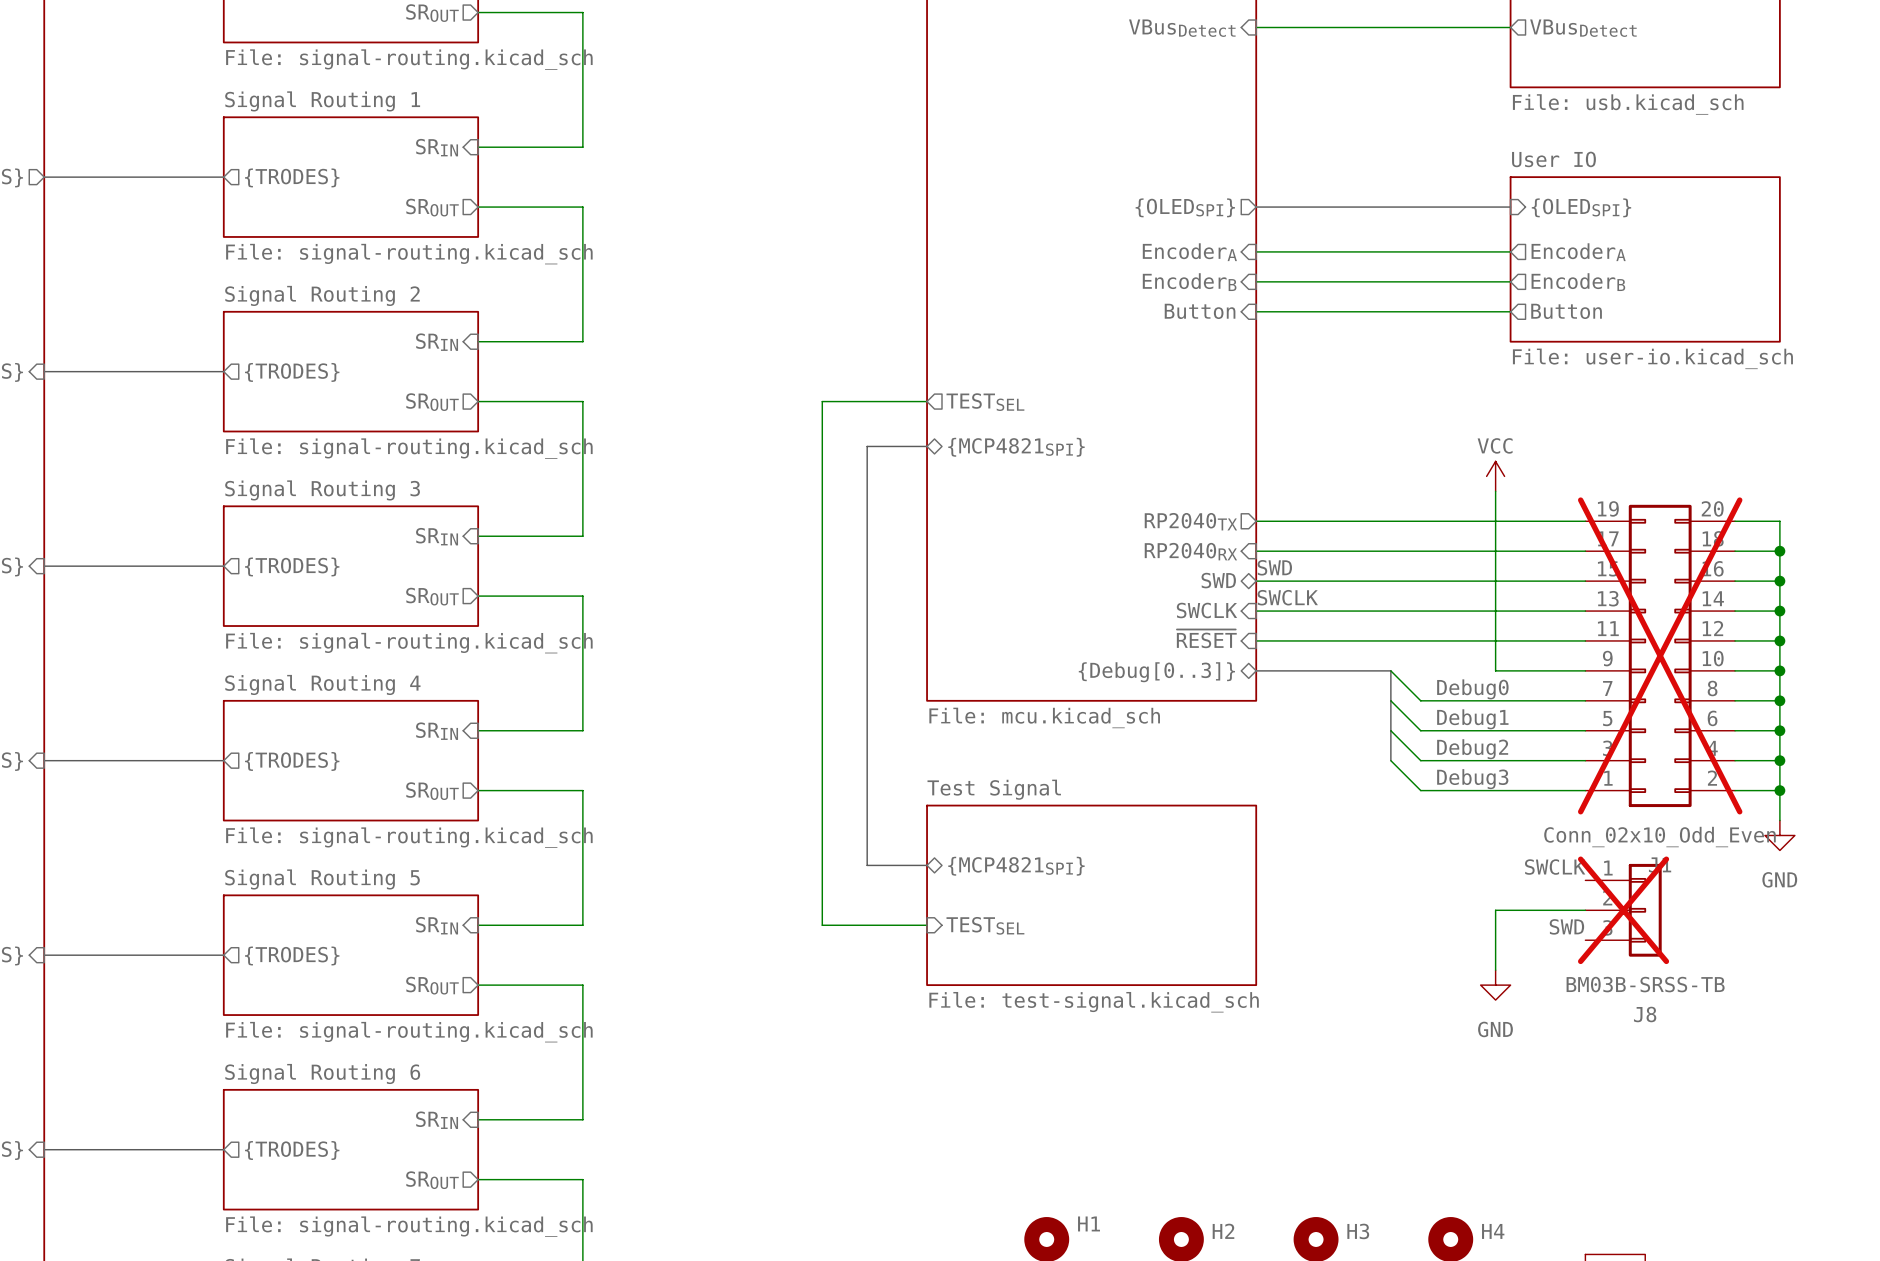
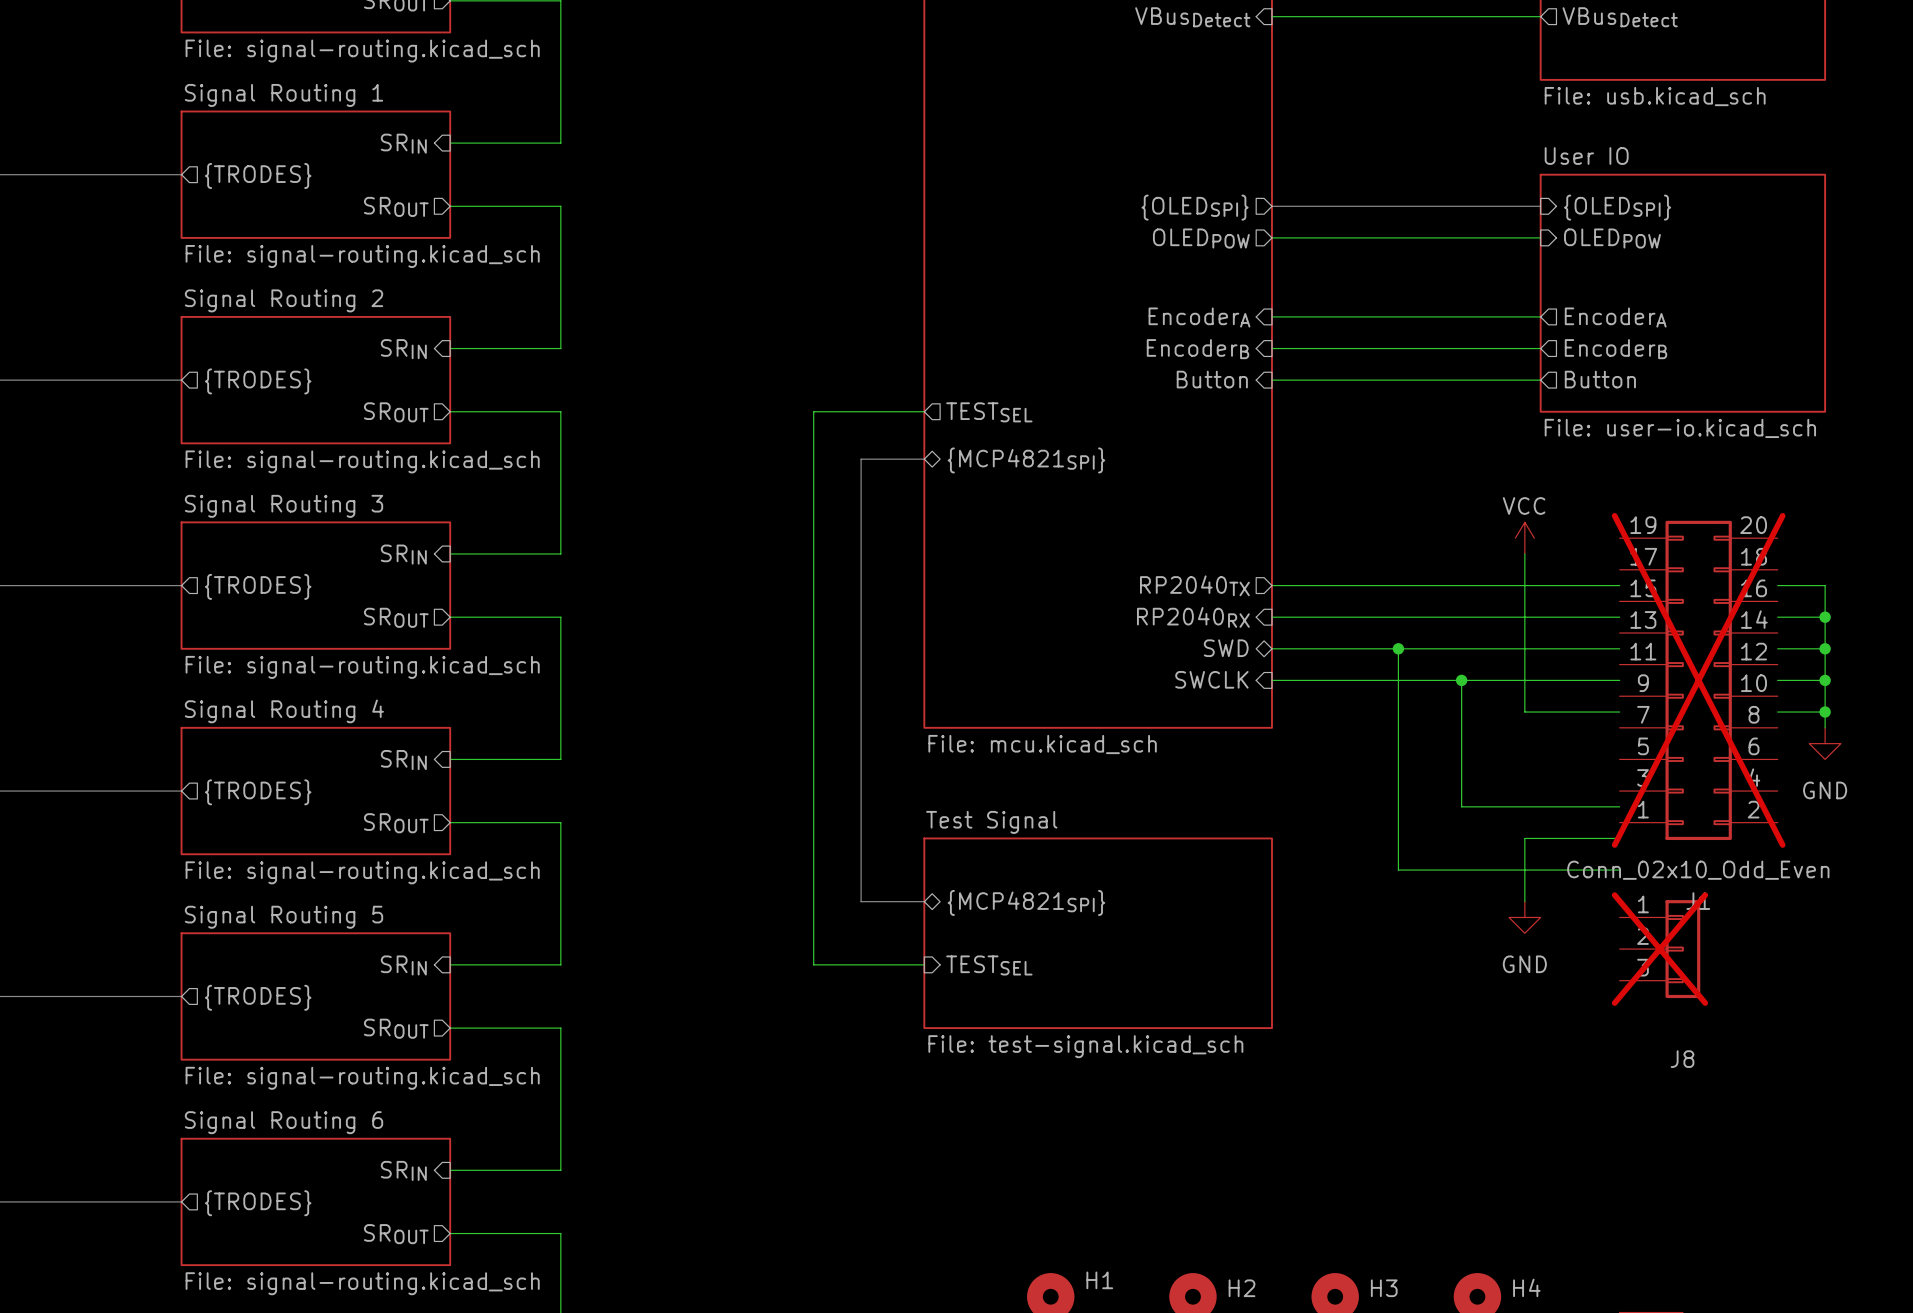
sheet pin: none -> OLEDPOW (1201, 238)
sheet pin: none -> OLEDPOW (1612, 238)
wire: (1256, 251) (1510, 251) -> (1271, 237) (1540, 237)
sheet pin: EncoderA (1189, 252) -> none
sheet pin: EncoderA (1578, 252) -> none
sheet User IO: File: user-io.kicad_sch (1645, 259) -> none
wire: (1256, 281) (1510, 281) -> (1271, 380) (1540, 380)
sheet pin position: EncoderB (1189, 282) -> EncoderB (1197, 349)
sheet pin position: EncoderB (1578, 282) -> EncoderB (1616, 349)
sheet User IO: none -> File: user-io.kicad_sch (1682, 293)
sheet pin: Button (1200, 311) -> EncoderA (1199, 317)
sheet pin: Button (1566, 311) -> EncoderA (1615, 317)
wire: none -> (1271, 348) (1540, 348)
sheet pin: none -> Button (1212, 379)
sheet pin: none -> Button (1600, 379)
power symbol position: VCC (1495, 476) -> VCC (1524, 538)
sheet pin position: RP2040TX (1190, 521) -> RP2040TX (1194, 585)
wire: (1256, 521) (1585, 521) -> none
wire: (1735, 521) (1779, 521) (1779, 566) -> (1777, 585) (1825, 585)
sheet pin position: RP2040RX (1190, 551) -> RP2040RX (1193, 617)
wire: (1256, 551) (1585, 551) -> (1271, 585) (1619, 585)
wire: (1735, 551) (1779, 551) -> none
junction: (1779, 551) -> none
label: SWD (1274, 567) -> none
sheet pin position: SWD (1218, 580) -> SWD (1226, 648)
wire: (1256, 581) (1585, 581) -> (1271, 617) (1619, 617)
wire: (1735, 581) (1779, 581) -> (1777, 617) (1825, 617)
junction: (1779, 581) -> none
junction: none -> (1825, 617)
label: SWCLK (1287, 597) -> none
sheet pin position: SWCLK (1206, 610) -> SWCLK (1211, 679)
wire: (1256, 611) (1585, 611) -> (1271, 648) (1619, 648)
wire: (1735, 611) (1779, 611) -> (1777, 648) (1825, 648)
junction: (1779, 611) -> none
wire: none -> (1398, 648) (1398, 870) (1619, 870)
junction: none -> (1398, 648)
junction: none -> (1825, 648)
sheet pin: ~{RESET} (1206, 638) -> none
wire: (1256, 640) (1585, 640) -> (1271, 680) (1619, 680)
wire: (1735, 640) (1779, 640) -> (1777, 680) (1825, 680)
junction: (1779, 640) -> none
wire: none -> (1461, 680) (1461, 806) (1619, 806)
junction: none -> (1461, 680)
junction: none -> (1825, 680)
bus: (1256, 670) (1390, 670) (1390, 760) -> none
wire: (1390, 670) (1420, 700) (1585, 700) -> none
wire: (1495, 670) (1585, 670) -> (1524, 696) (1524, 712) (1619, 712)
wire: (1735, 670) (1779, 670) -> (1777, 712) (1825, 712)
junction: (1779, 670) -> none
sheet pin: {Debug[0..3]} (1156, 672) -> none
junction: none -> (1825, 712)
label: Debug0 (1472, 689) -> none
wire: (1390, 700) (1420, 730) (1585, 730) -> none
wire: (1735, 700) (1779, 700) (1779, 820) -> none
junction: (1779, 700) -> none
label: Debug1 (1472, 719) -> none
wire: (1390, 730) (1420, 760) (1585, 760) -> none
wire: (1735, 730) (1779, 730) -> none
junction: (1779, 730) -> none
label: Debug2 (1472, 749) -> none
wire: (1390, 760) (1420, 790) (1585, 790) -> none
wire: (1735, 760) (1779, 760) -> none
junction: (1779, 760) -> none
label: Debug3 (1472, 779) -> none
wire: (1735, 790) (1779, 790) -> none
junction: (1779, 790) -> none
power symbol position: GND (1779, 835) -> GND (1825, 743)
label: SWCLK (1555, 867) -> none
wire: (1585, 910) (1495, 910) (1495, 970) -> (1619, 838) (1524, 838) (1524, 901)
label: SWD (1566, 926) -> none
J8 value: BM03B-SRSS-TB (1645, 984) -> none
power symbol position: GND (1495, 985) -> GND (1524, 917)

